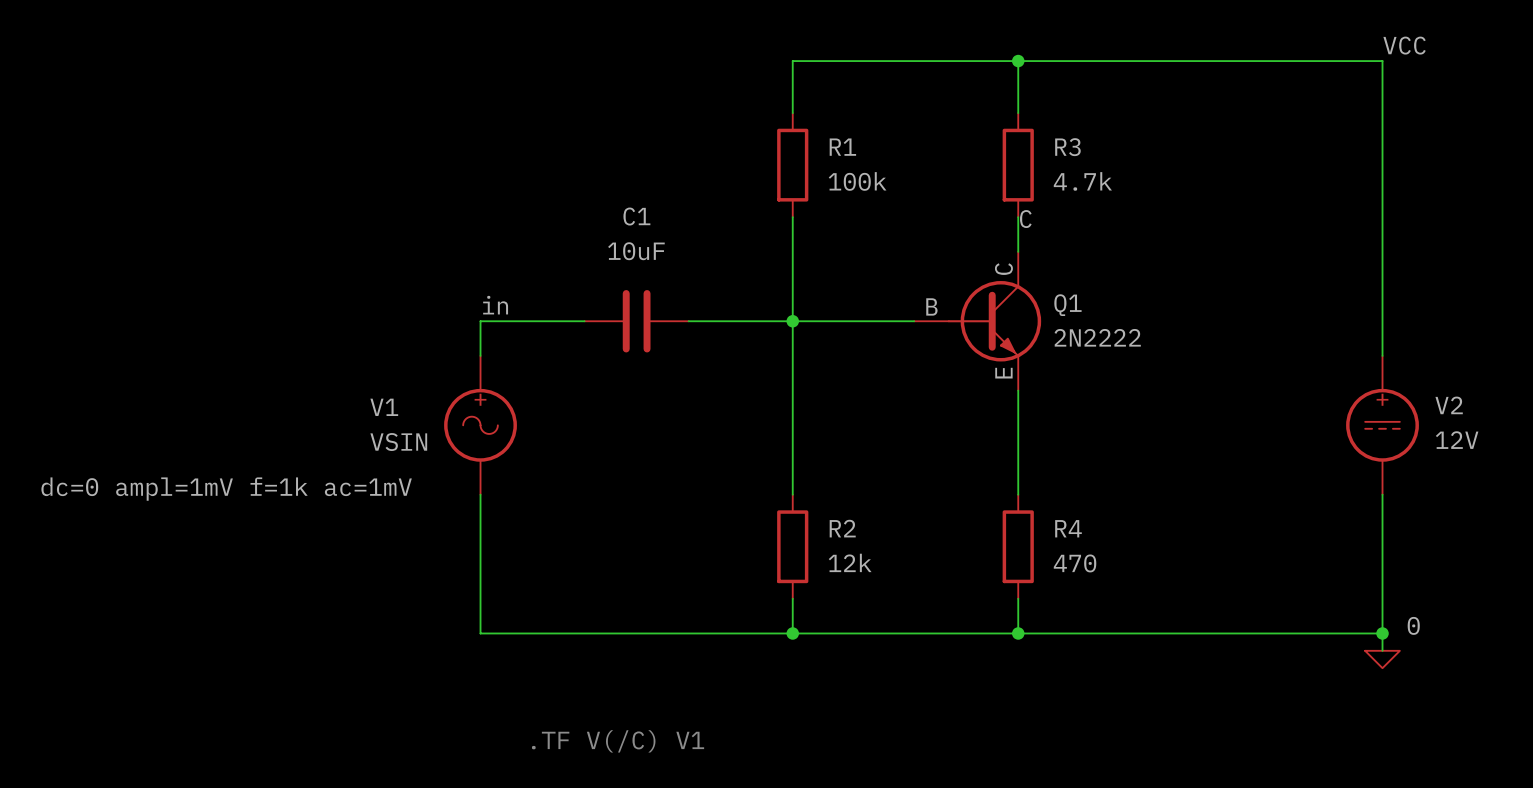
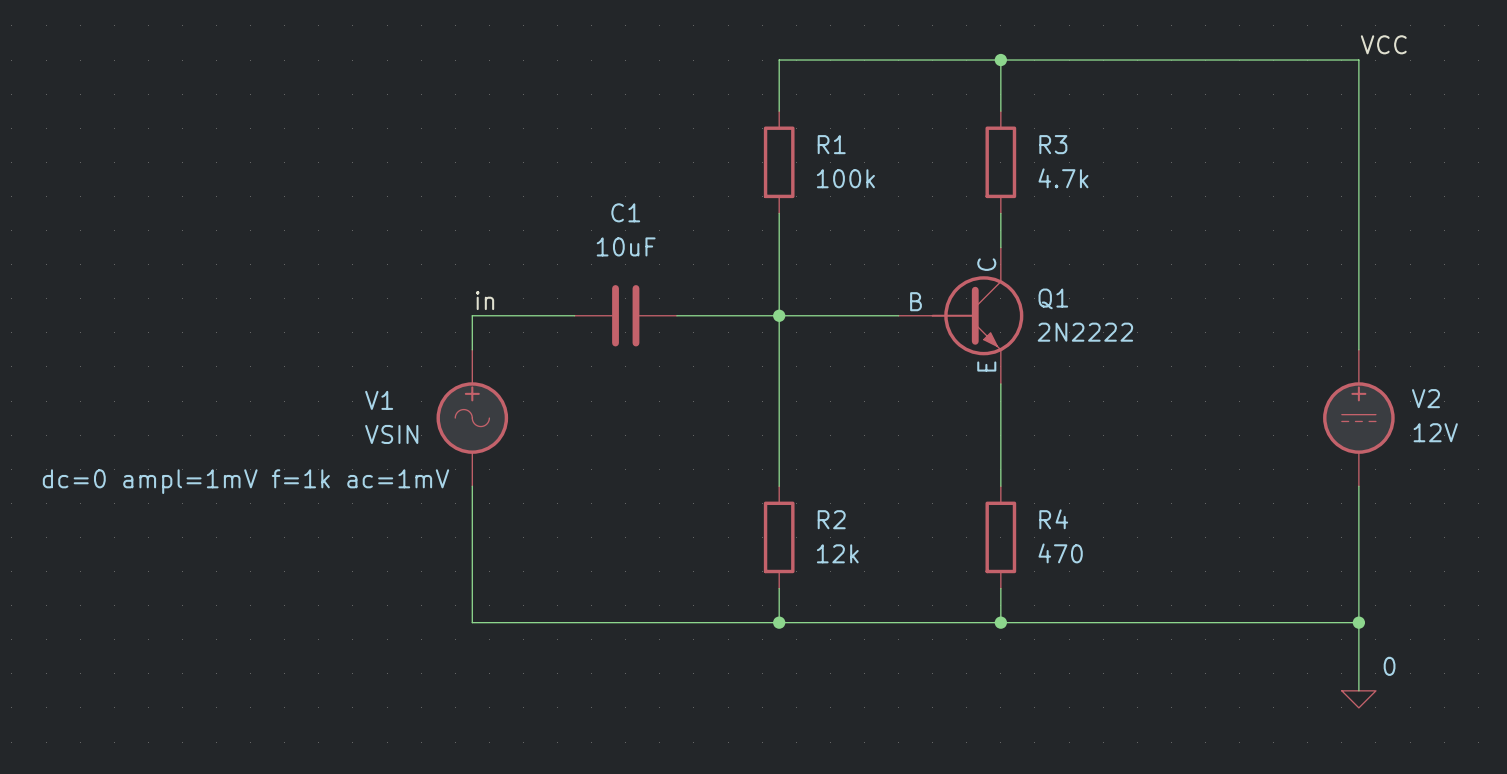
label: C (1025, 219) -> none
wire: none -> (1358, 639) (1358, 690)
power symbol position: 0 (1382, 659) -> 0 (1358, 699)
text: .TF V(/C) V1 (618, 741) -> none

